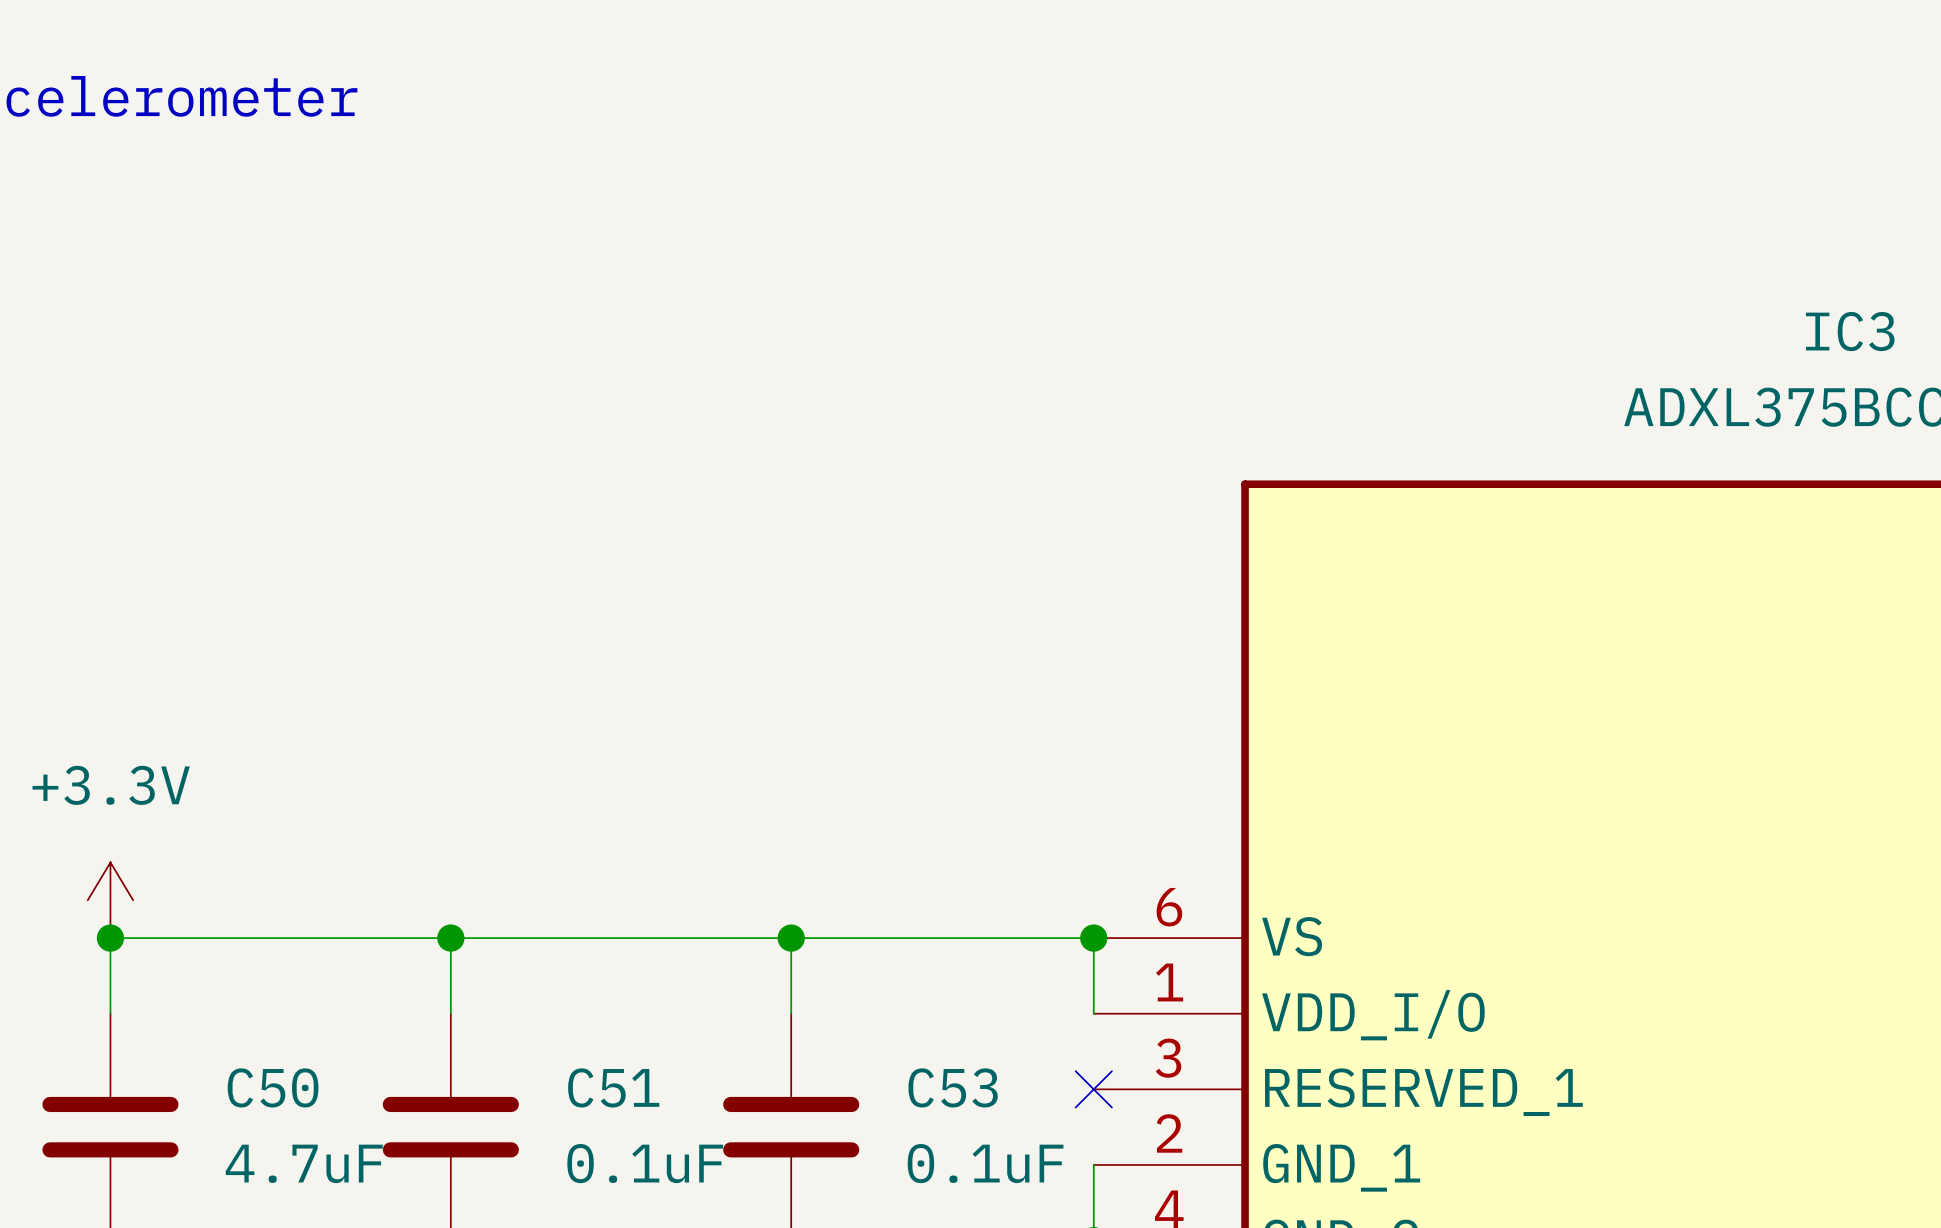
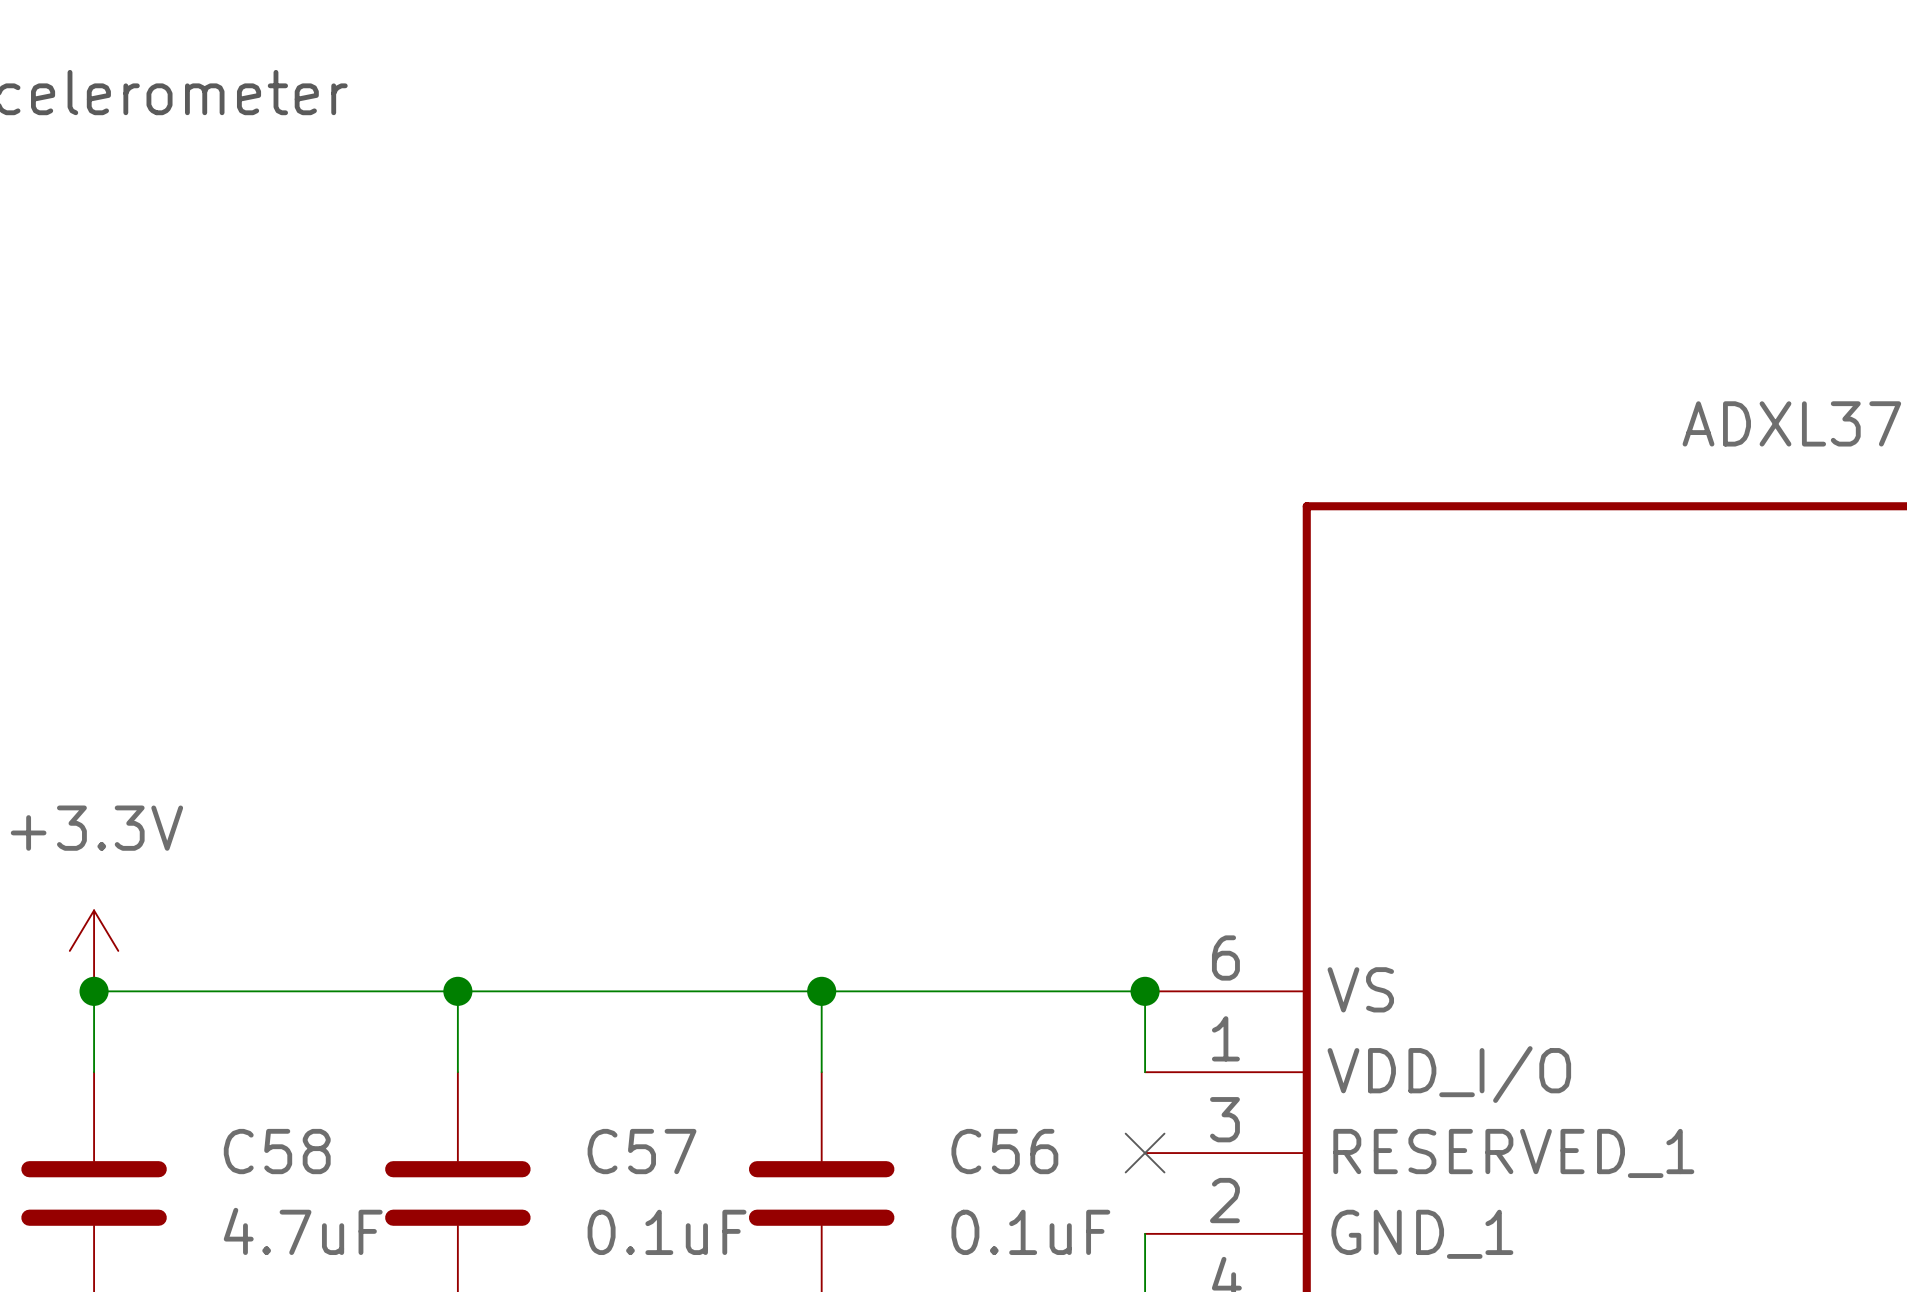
C50 name: C50 (273, 1087) -> C58 (277, 1151)
C51 name: C51 (613, 1087) -> C57 (642, 1151)
C53 name: C53 (953, 1087) -> C56 (1004, 1151)

